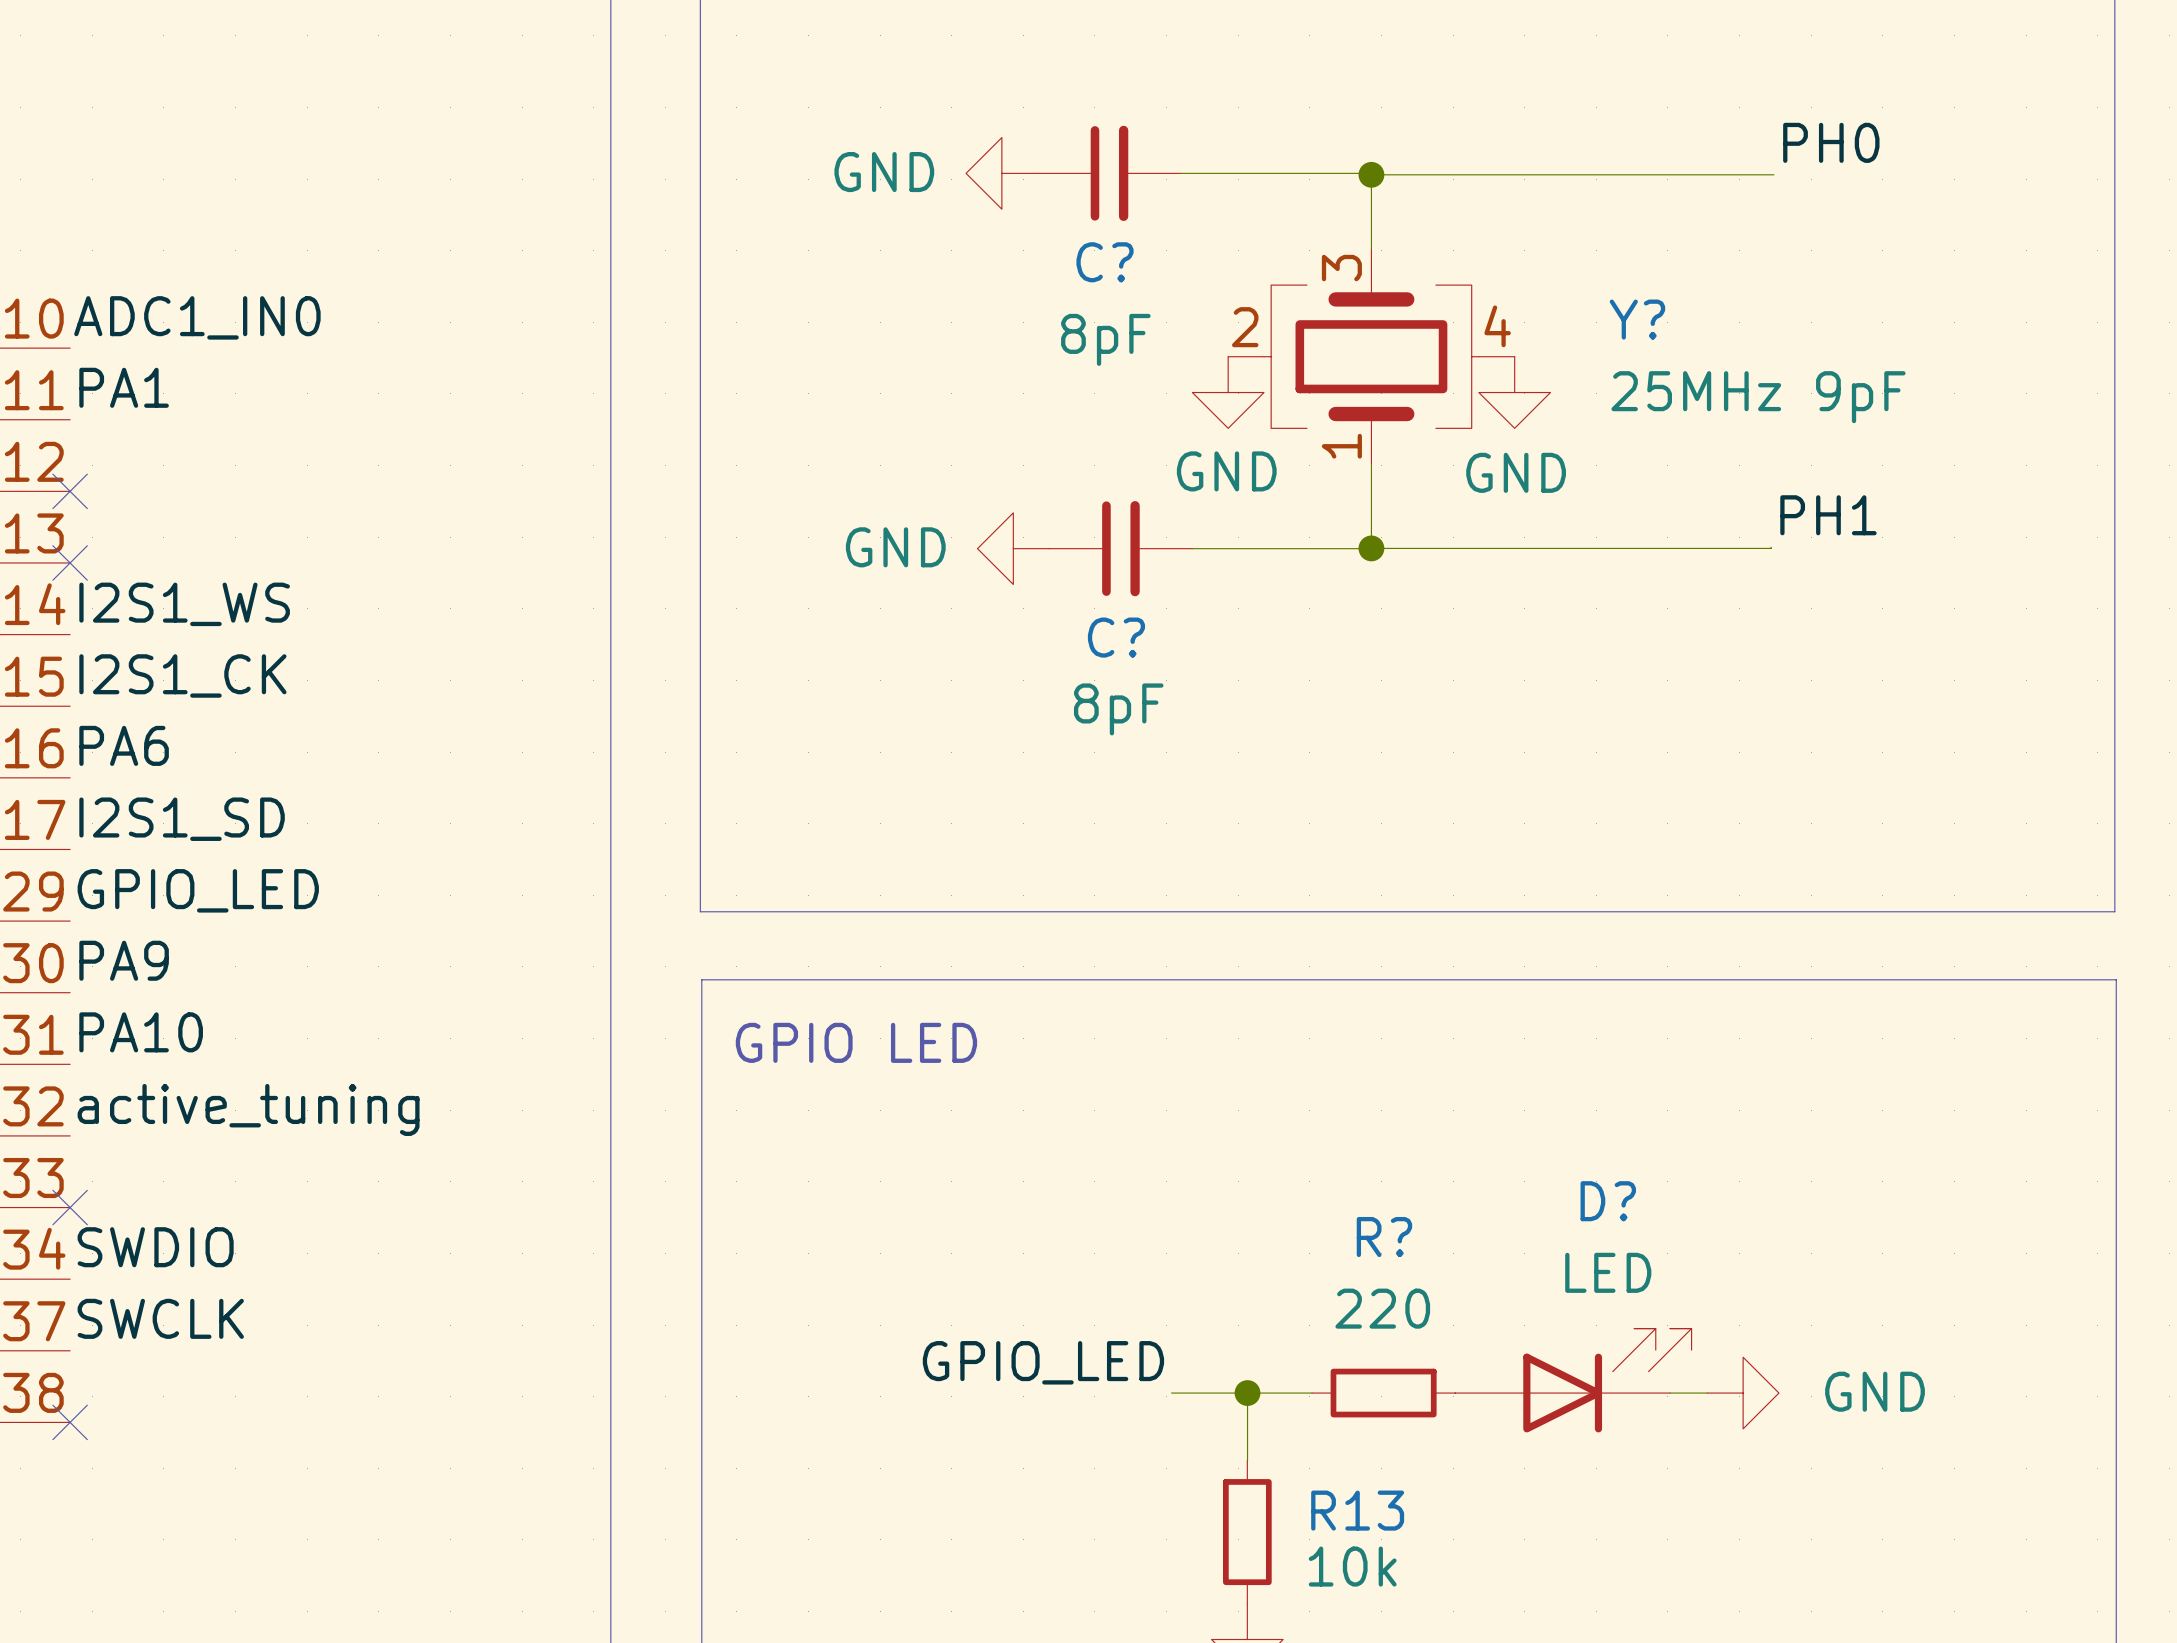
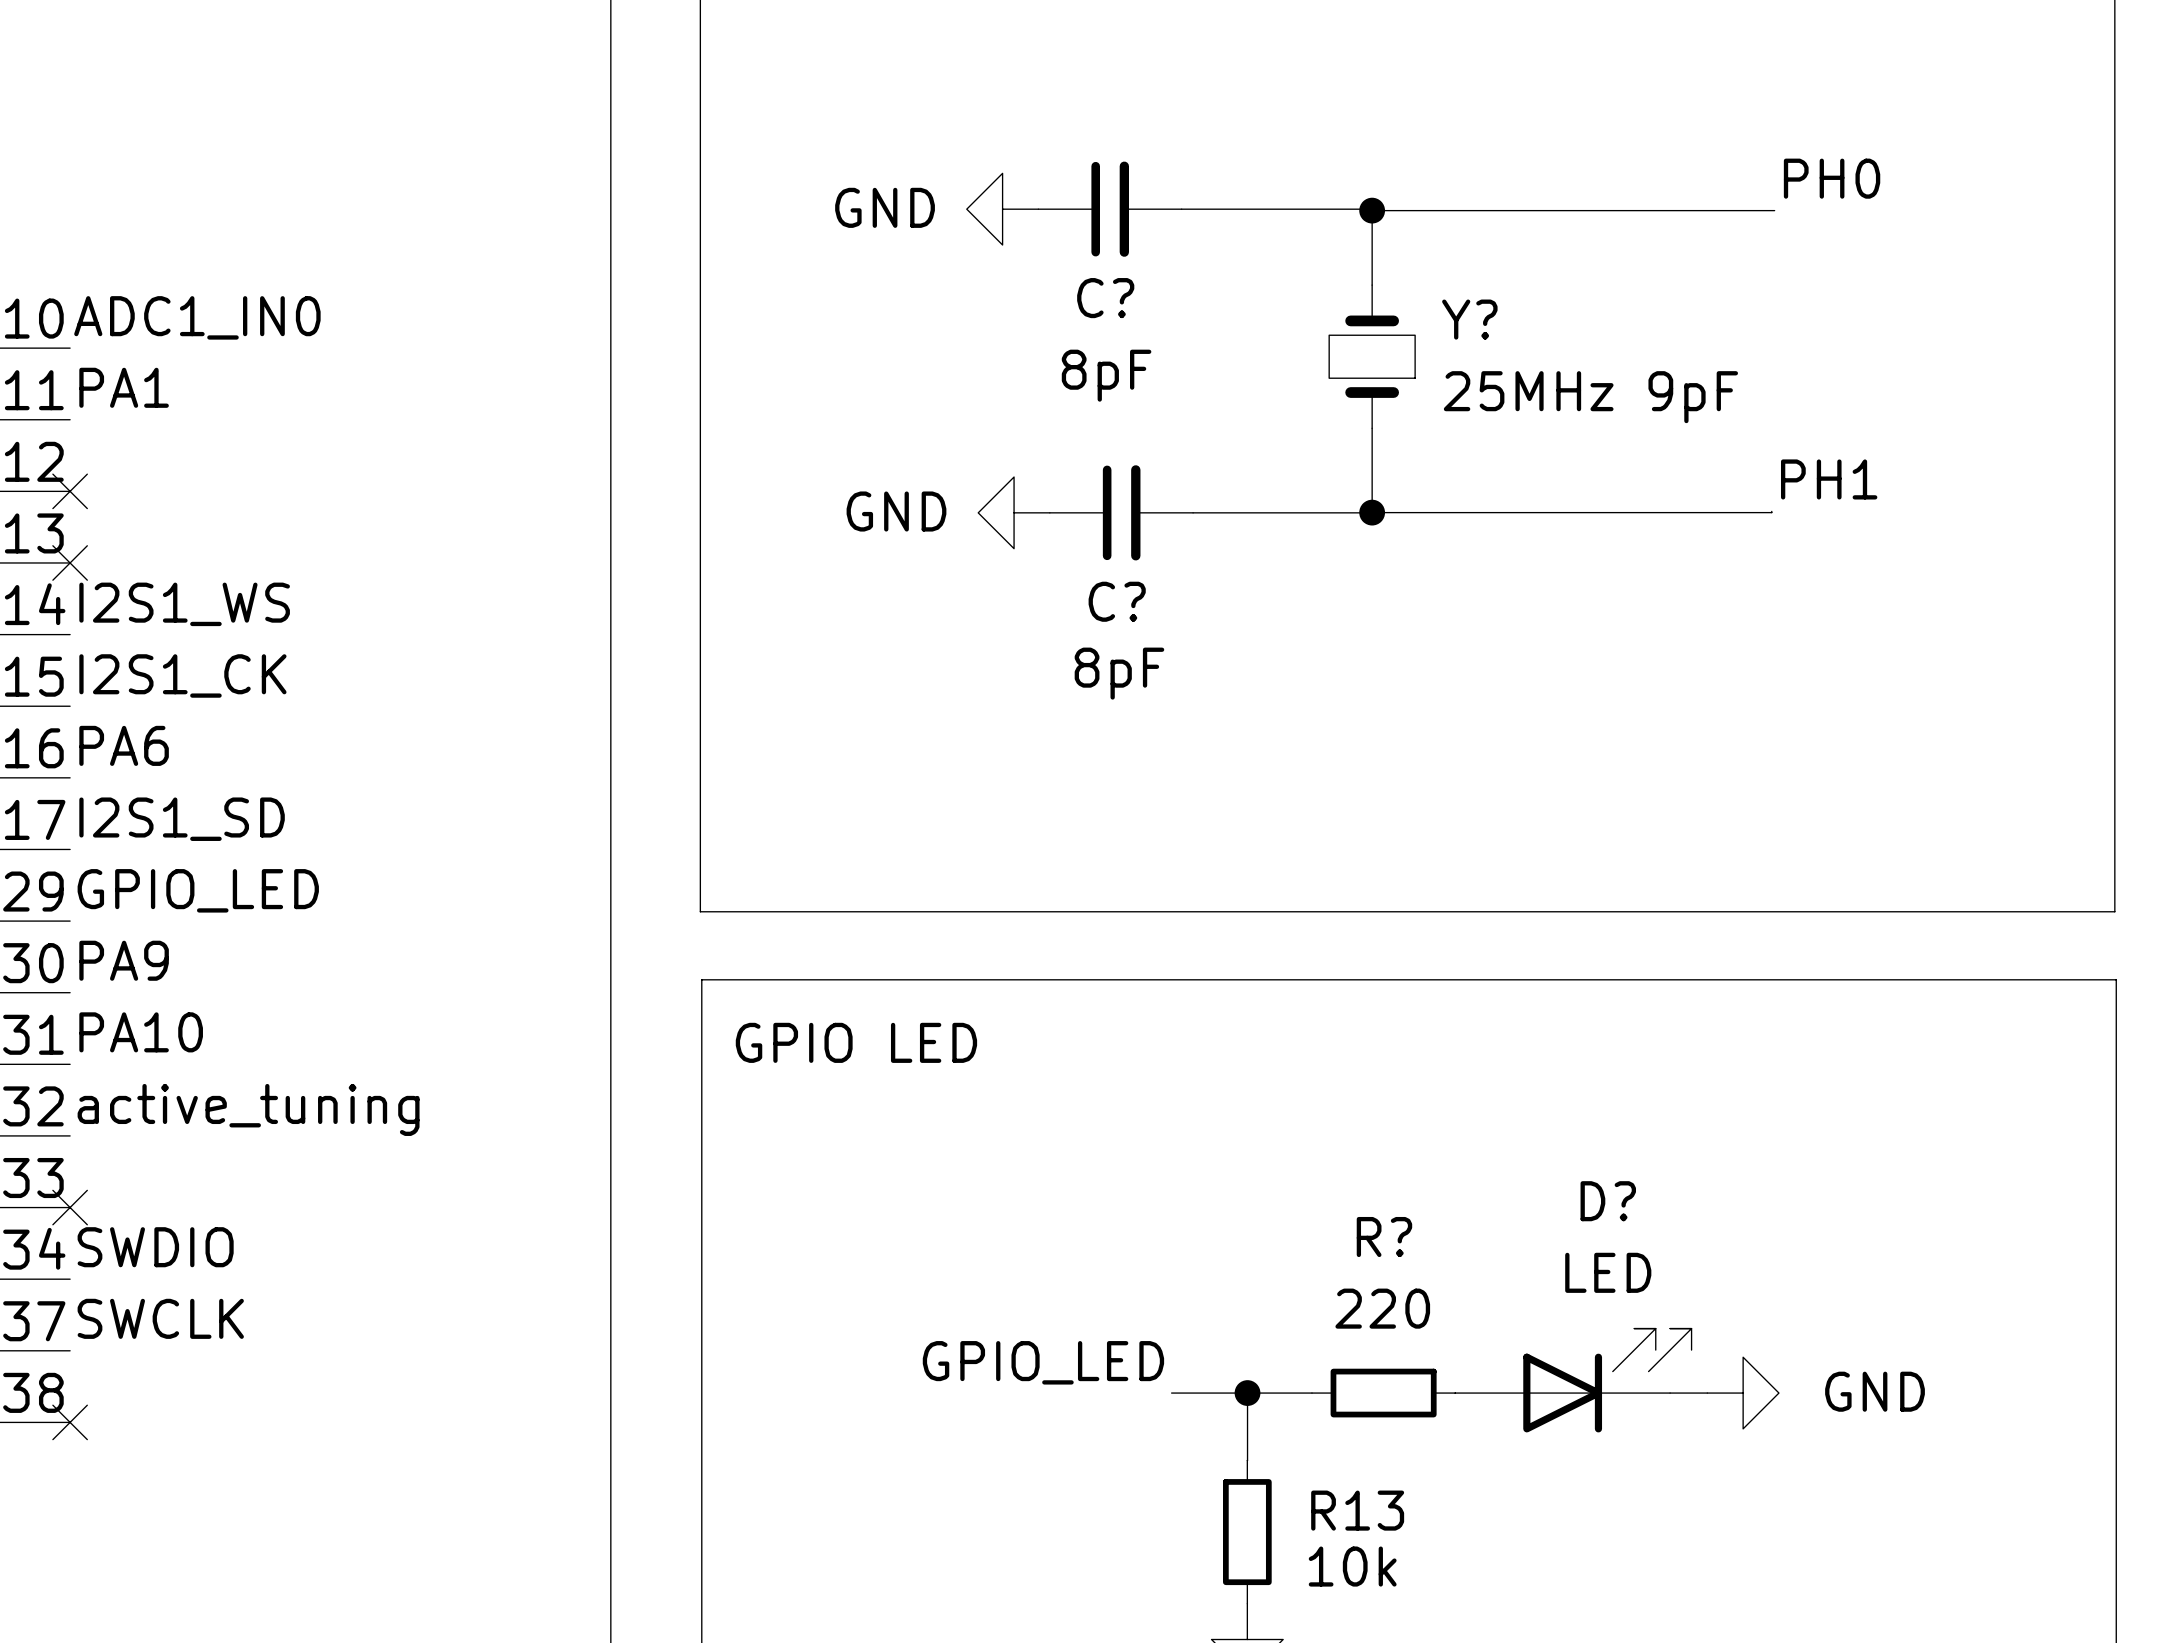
label position: PH0 (1831, 142) -> PH0 (1832, 178)
power symbol position: GND (1001, 173) -> GND (1002, 209)
C? position: (1109, 173) -> (1110, 209)
wire: (1180, 173) (1371, 173) (1371, 249) -> (1181, 209) (1372, 209) (1372, 285)
wire: (1371, 174) (1773, 174) -> (1372, 210) (1774, 210)
junction position: (1371, 174) -> (1372, 210)
Y? symbol: [1228, 249, 1515, 465] -> [1329, 285, 1416, 429]
Y? name position: Y? (1637, 319) -> Y? (1469, 319)
power symbol: GND (1228, 392) -> none
power symbol: GND (1514, 392) -> none
Y? value position: 25MHz 9pF (1758, 397) -> 25MHz 9pF (1590, 397)
wire: (1371, 464) (1371, 548) (1192, 548) -> (1372, 428) (1372, 512) (1193, 512)
label position: PH1 (1828, 515) -> PH1 (1829, 479)
wire: (1771, 547) (1371, 548) -> (1771, 511) (1372, 512)
power symbol position: GND (1013, 548) -> GND (1014, 512)
C? position: (1120, 548) -> (1121, 512)
junction position: (1371, 548) -> (1372, 512)

